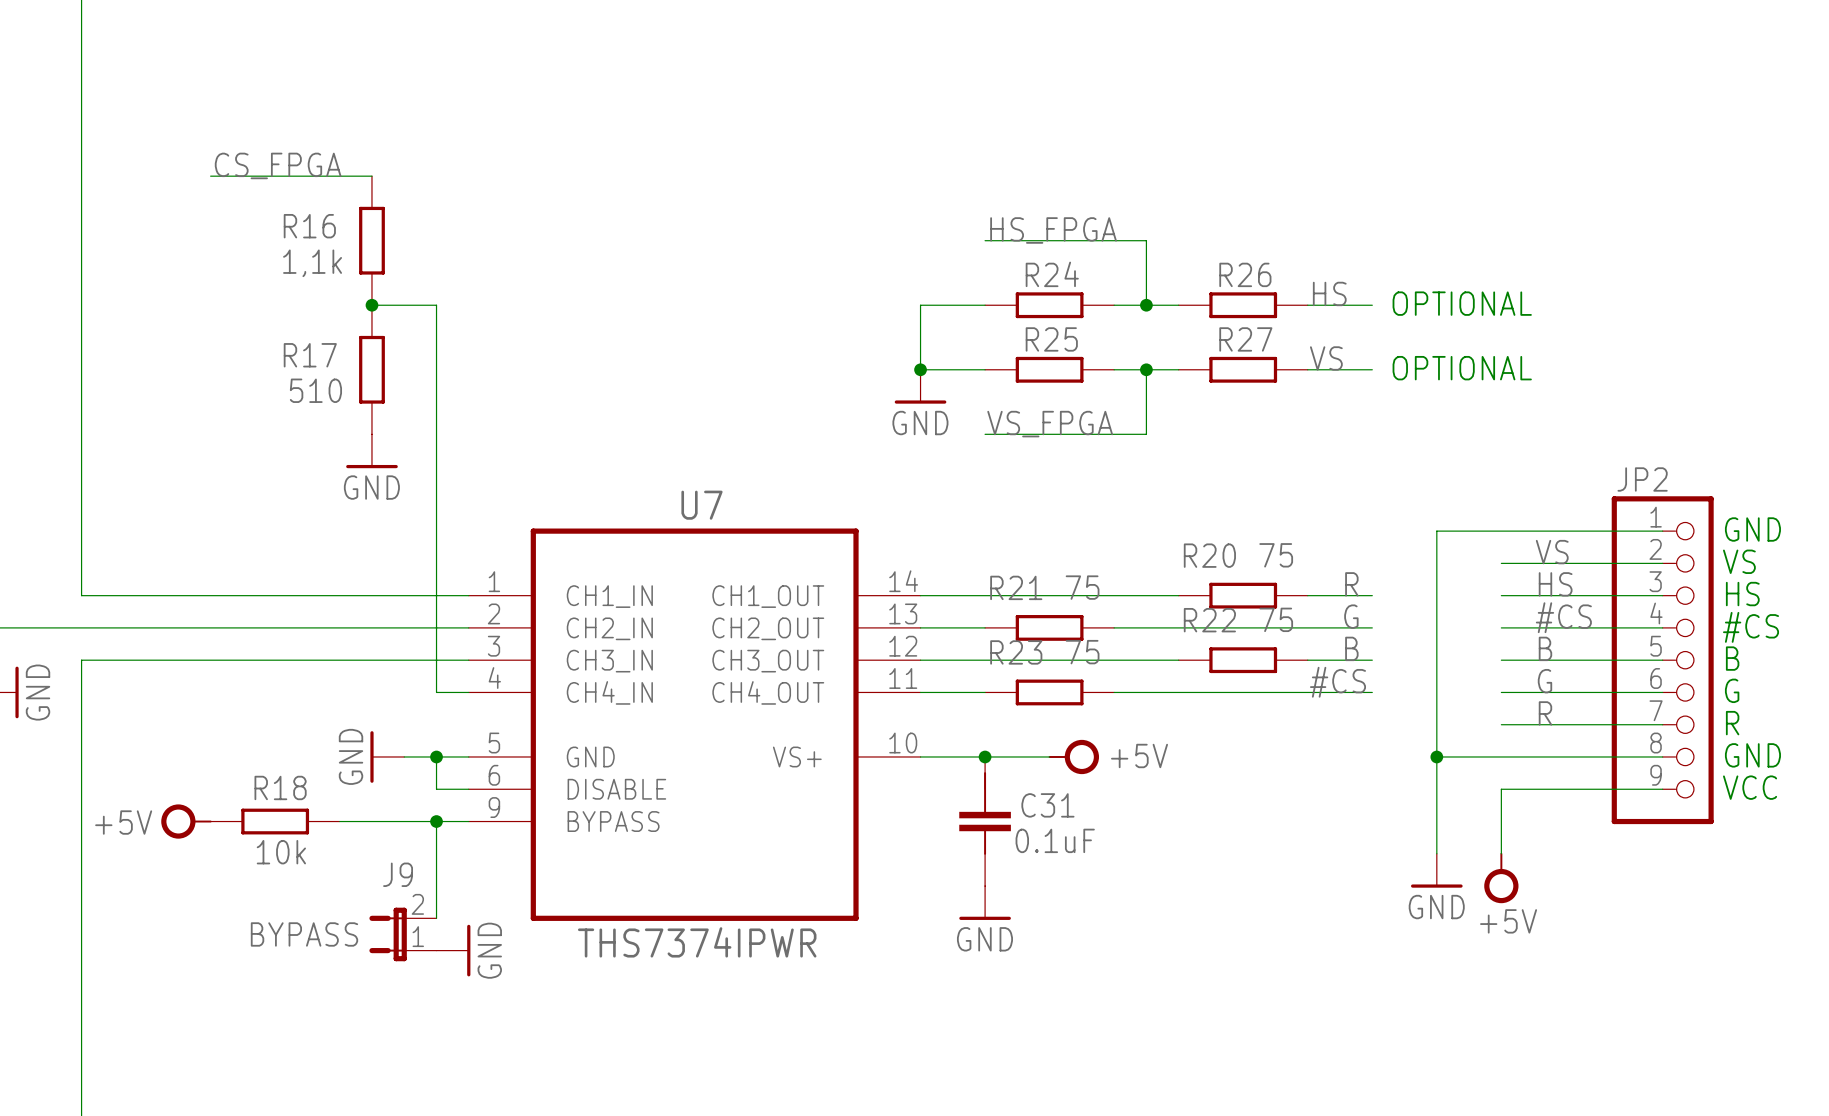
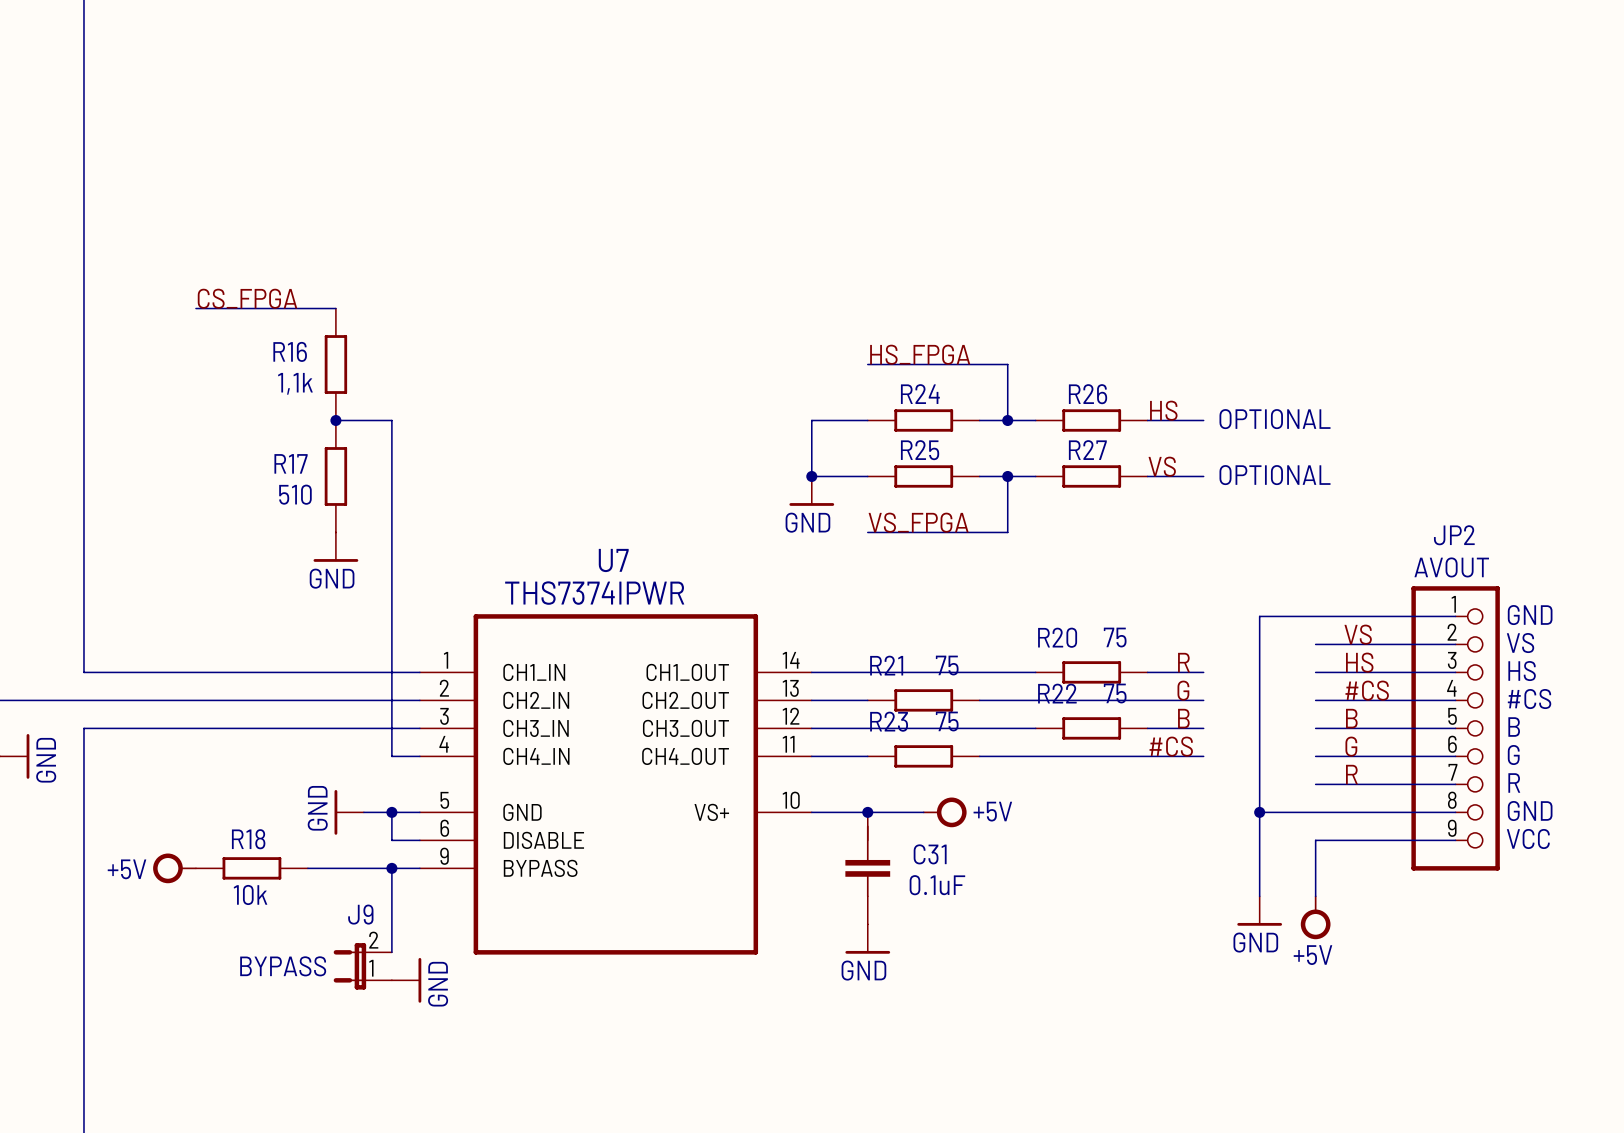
JP2 value: none -> AVOUT (1451, 567)
JP2 name position: JP2 (1642, 479) -> JP2 (1454, 535)
U7 name position: U7 (701, 505) -> U7 (613, 560)
U7 value position: THS7374IPWR (697, 942) -> THS7374IPWR (594, 593)

